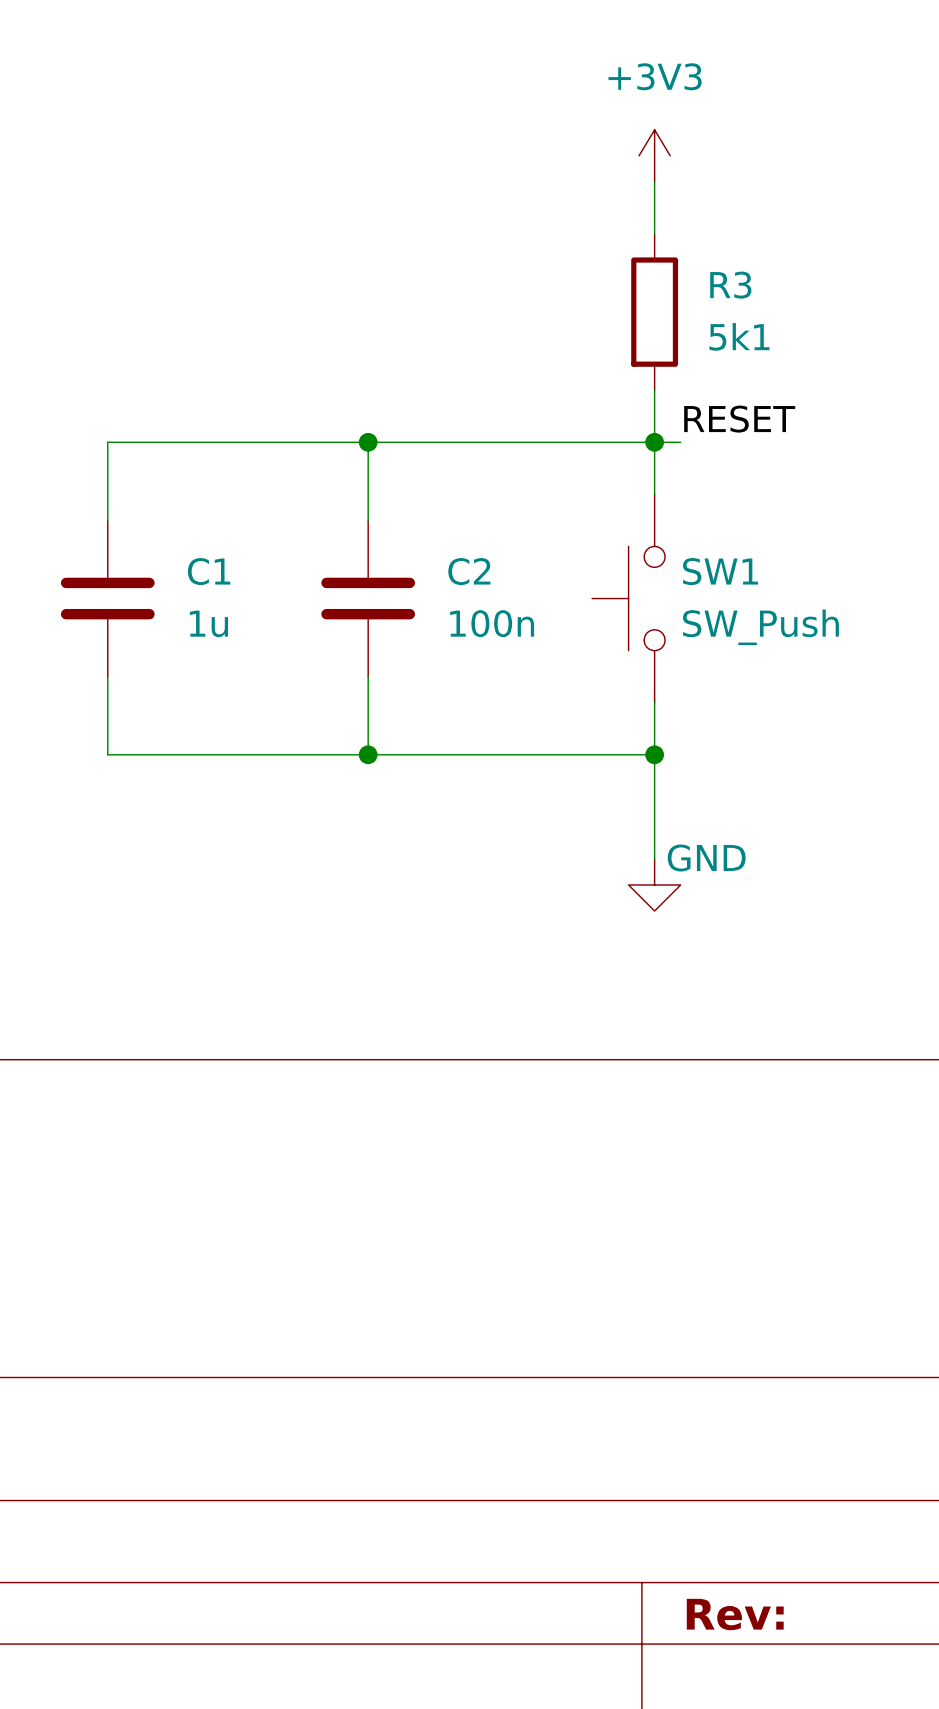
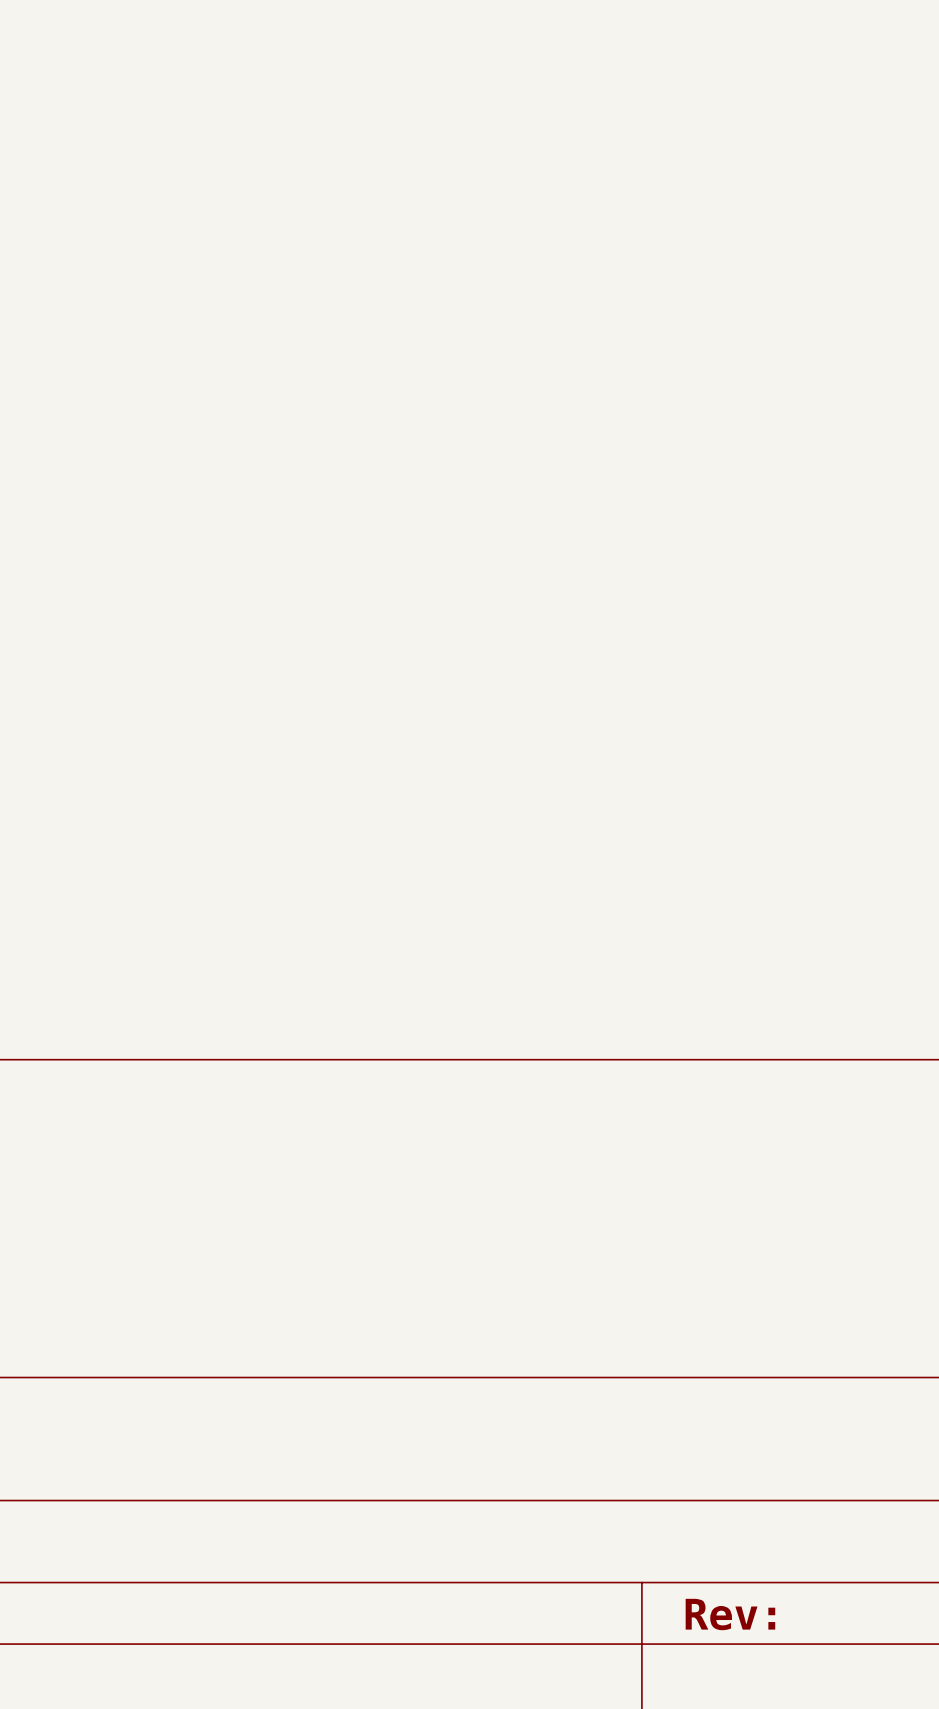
power symbol: +3V3 (654, 155) -> none
wire: (654, 181) (654, 233) -> none
R3: 5k1 (654, 312) -> none
wire: (654, 390) (654, 494) -> none
label: RESET (739, 419) -> none
wire: (368, 442) (368, 520) -> none
junction: (368, 442) -> none
junction: (654, 442) -> none
wire: (680, 442) (107, 442) (107, 520) -> none
C1: 1u (107, 598) -> none
C2: 100n (368, 598) -> none
SW1: SW_Push (628, 598) -> none
wire: (107, 676) (107, 754) (654, 754) -> none
wire: (368, 676) (368, 754) -> none
wire: (654, 702) (654, 858) -> none
junction: (368, 754) -> none
junction: (654, 754) -> none
power symbol: GND (654, 884) -> none

